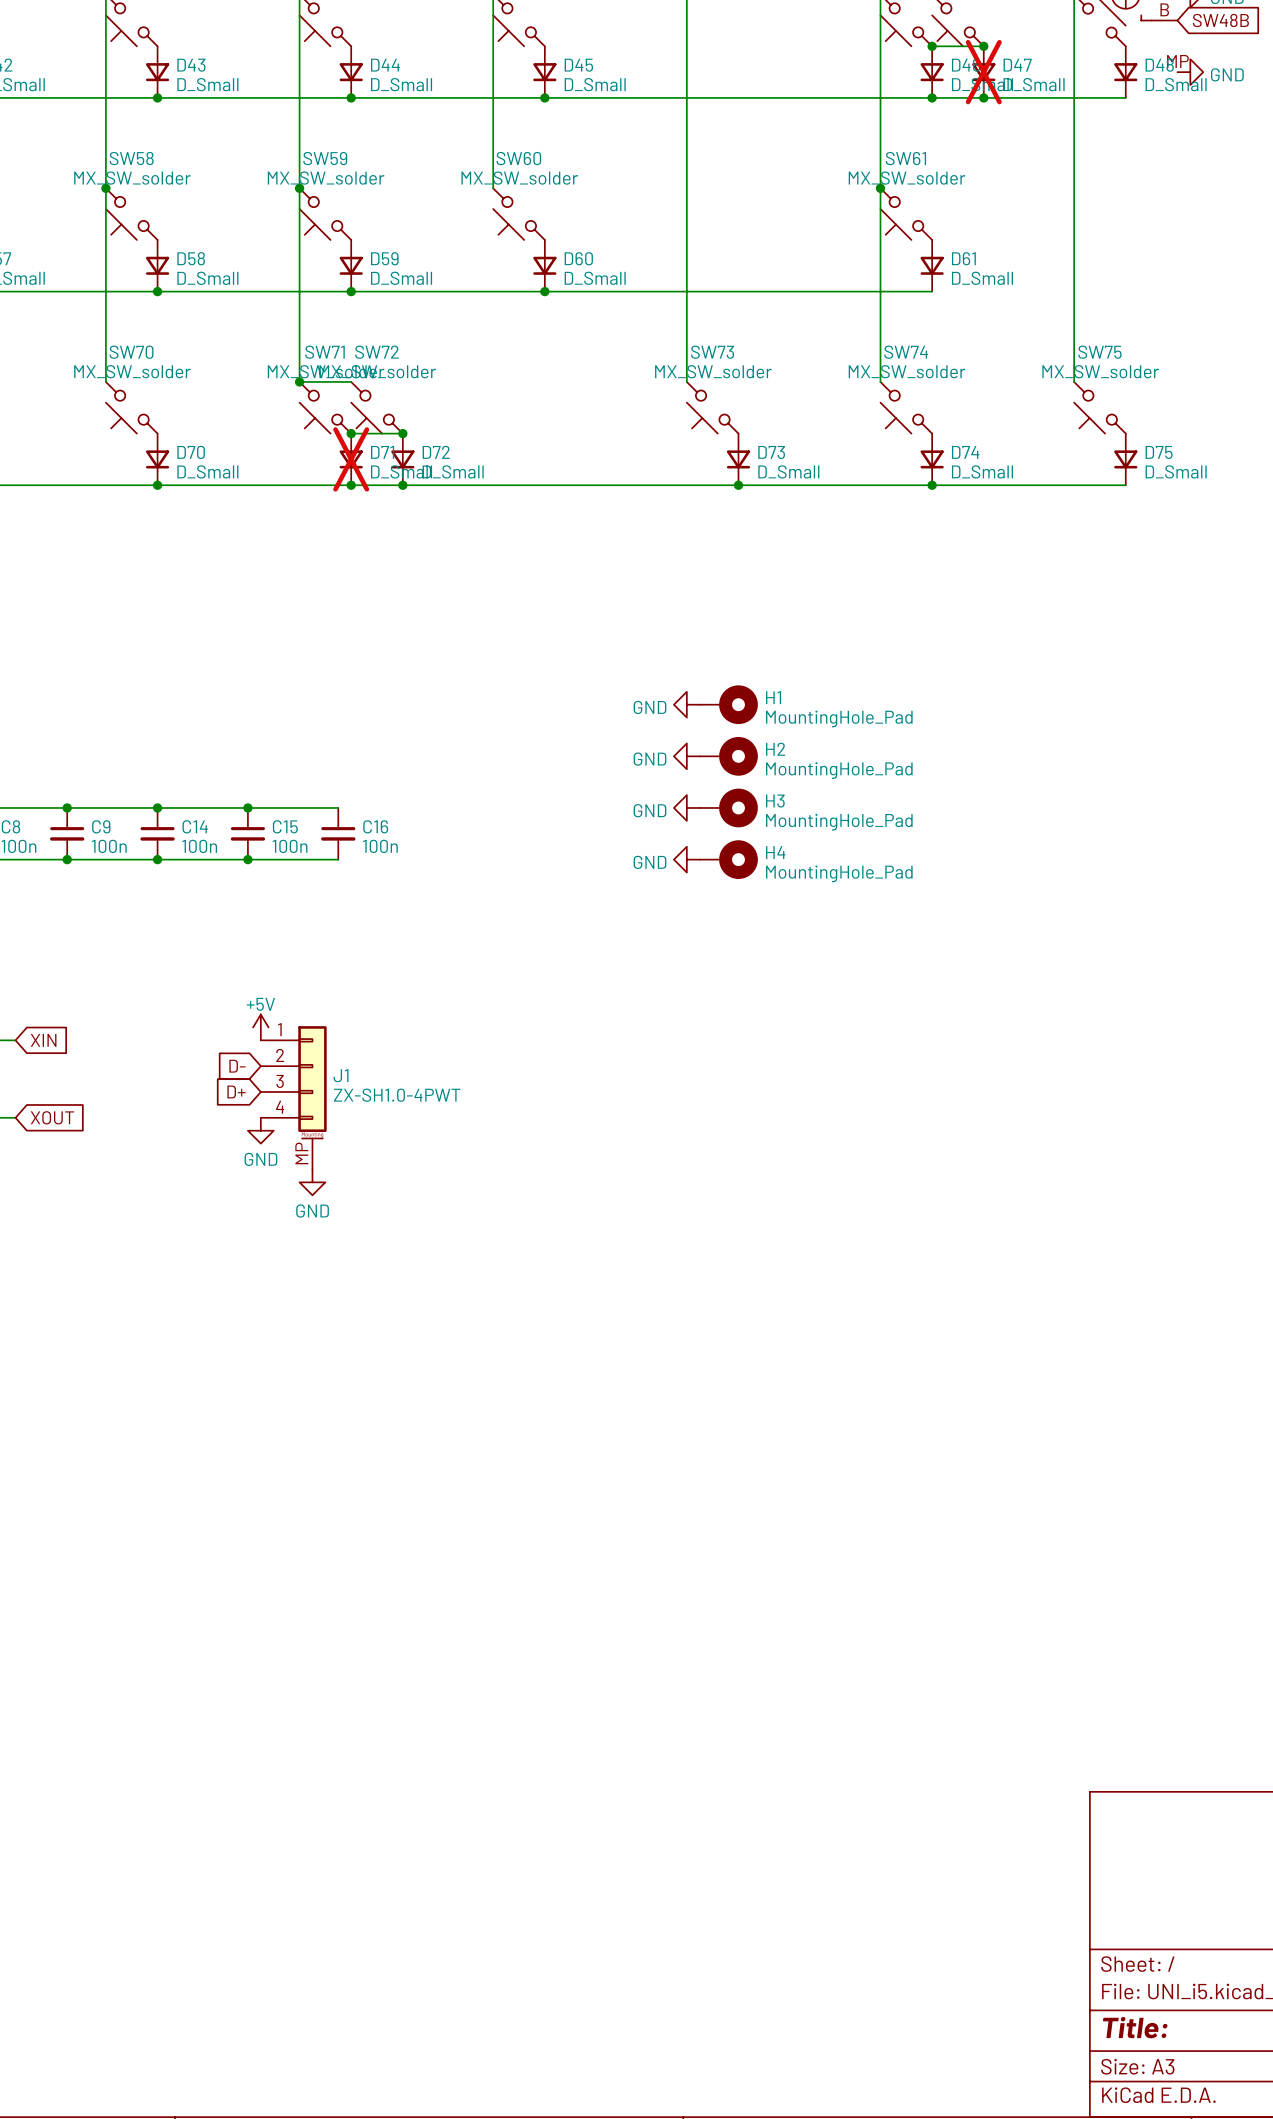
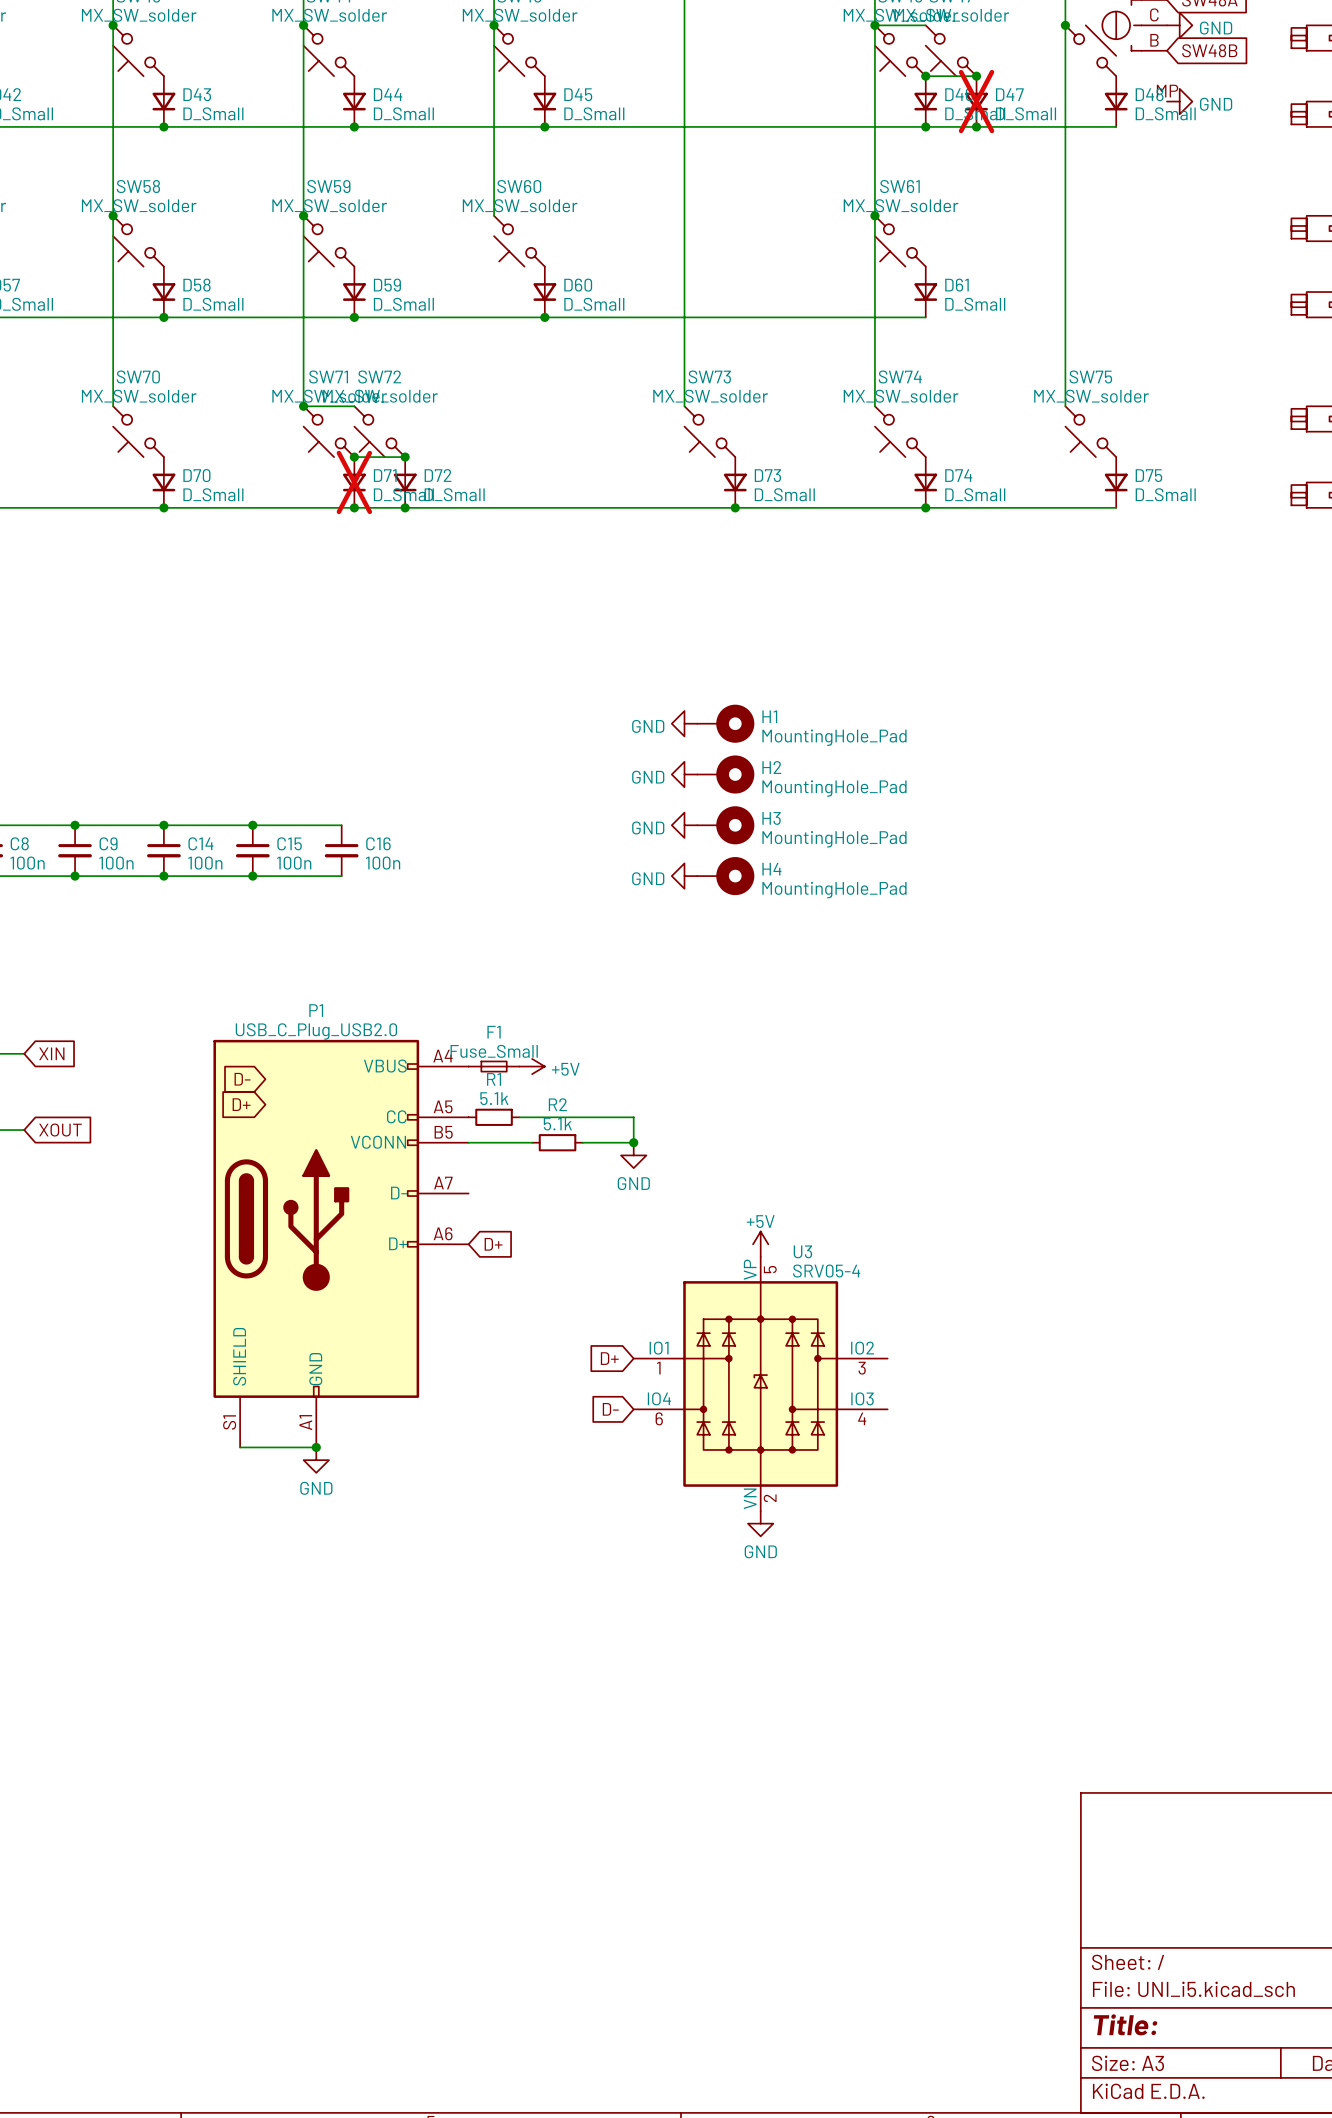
power symbol: +5V (260, 1027) -> none
F1: none -> Fuse_Small (494, 1066)
power symbol: none -> +5V (532, 1066)
J1: ZX-SH1.0-4PWT (293, 1097) -> none
R1: none -> 5.1k (494, 1117)
wire: none -> (519, 1117) (633, 1117) (633, 1142) (582, 1142)
power symbol: GND (260, 1130) -> none
wire: none -> (468, 1142) (532, 1142)
R2: none -> 5.1k (557, 1142)
junction: none -> (633, 1142)
power symbol: none -> GND (633, 1155)
power symbol: GND (312, 1182) -> none
P1: none -> USB_C_Plug_USB2.0 (341, 1243)
global label: none -> D+ (493, 1244)
power symbol: none -> +5V (760, 1244)
global label: none -> D+ (609, 1358)
U3: none -> SRV05-4 (760, 1383)
global label: none -> D- (610, 1409)
wire: none -> (240, 1447) (316, 1447)
junction: none -> (316, 1447)
power symbol: none -> GND (316, 1460)
power symbol: none -> GND (760, 1523)

